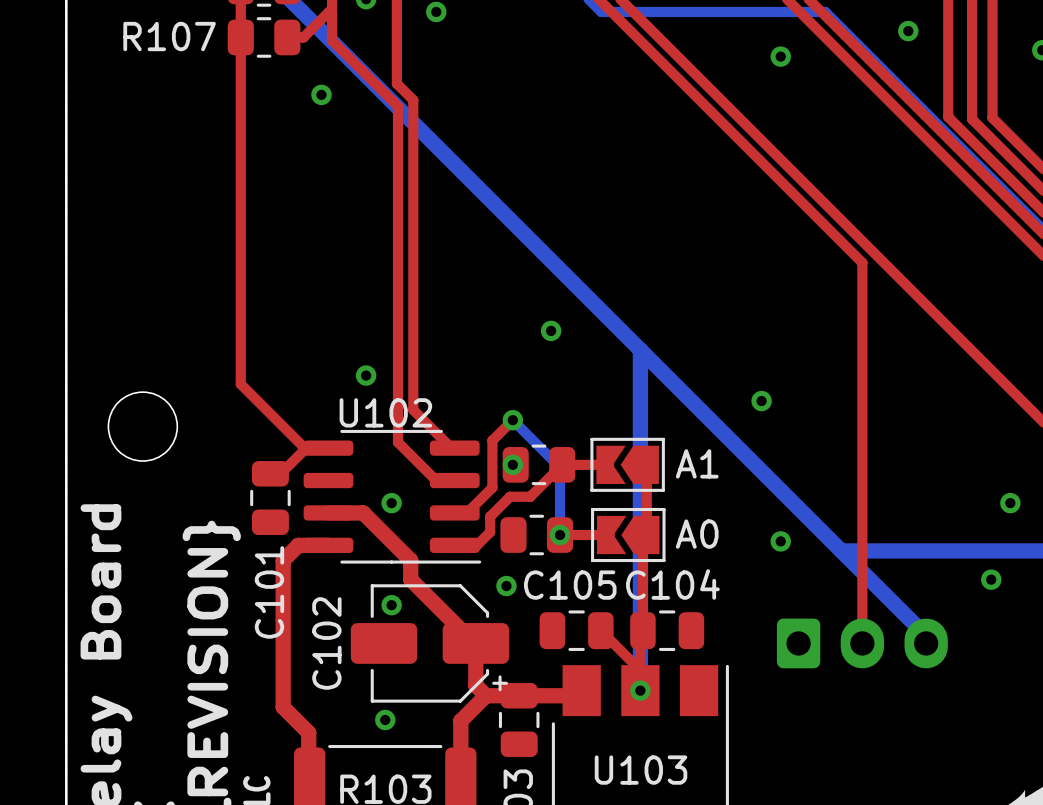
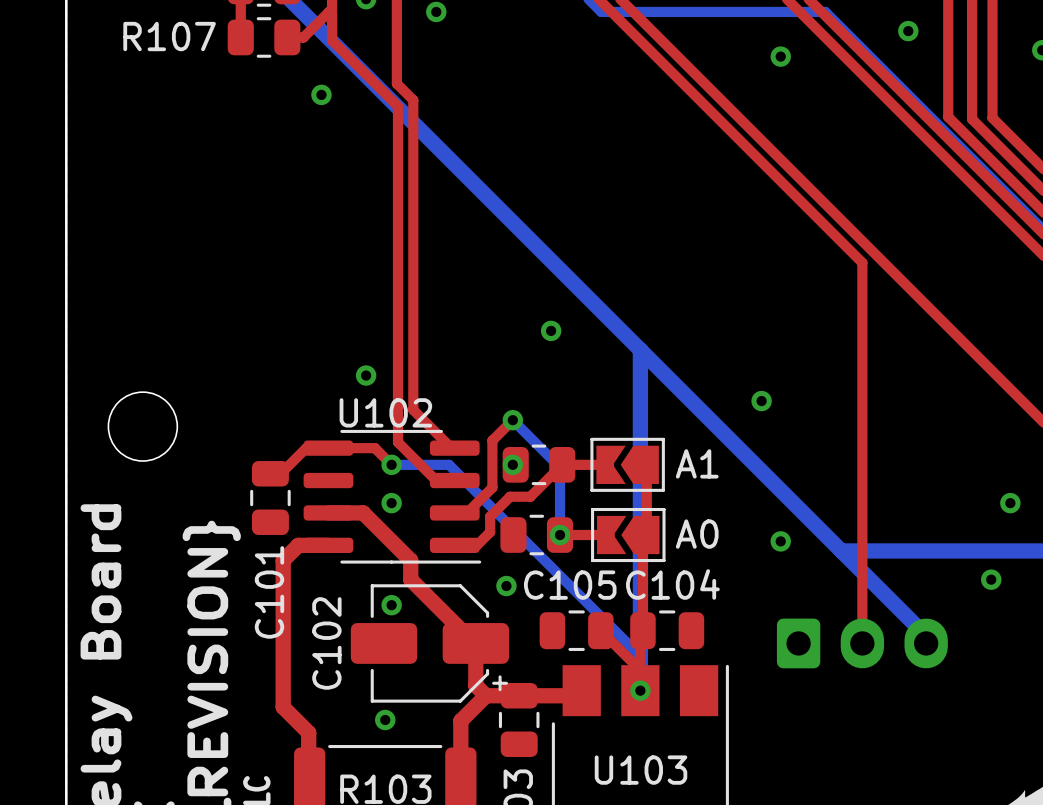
top track: (240, 37) (240, 384) (306, 448) -> none
top track: none -> (328, 448) (374, 448) (391, 464)
bottom track: none -> (391, 464) (449, 464) (640, 656)
via: none -> (391, 464)

